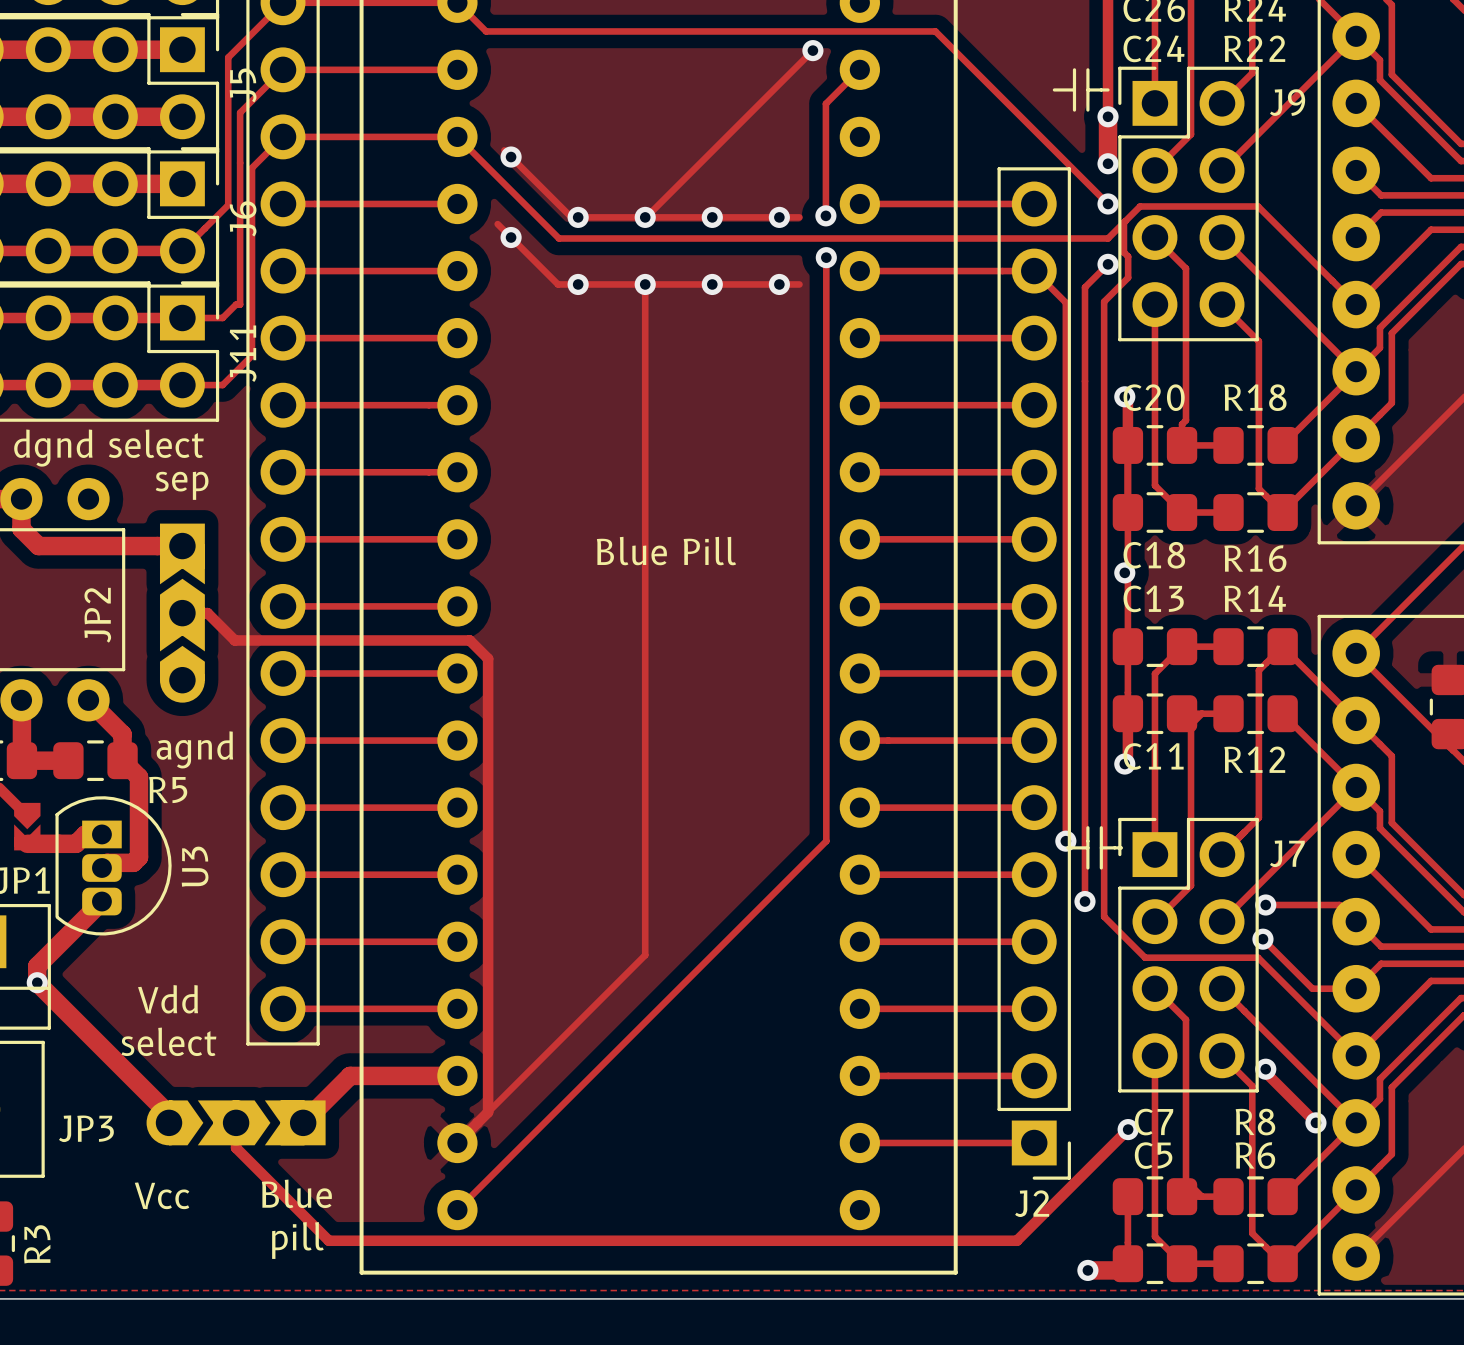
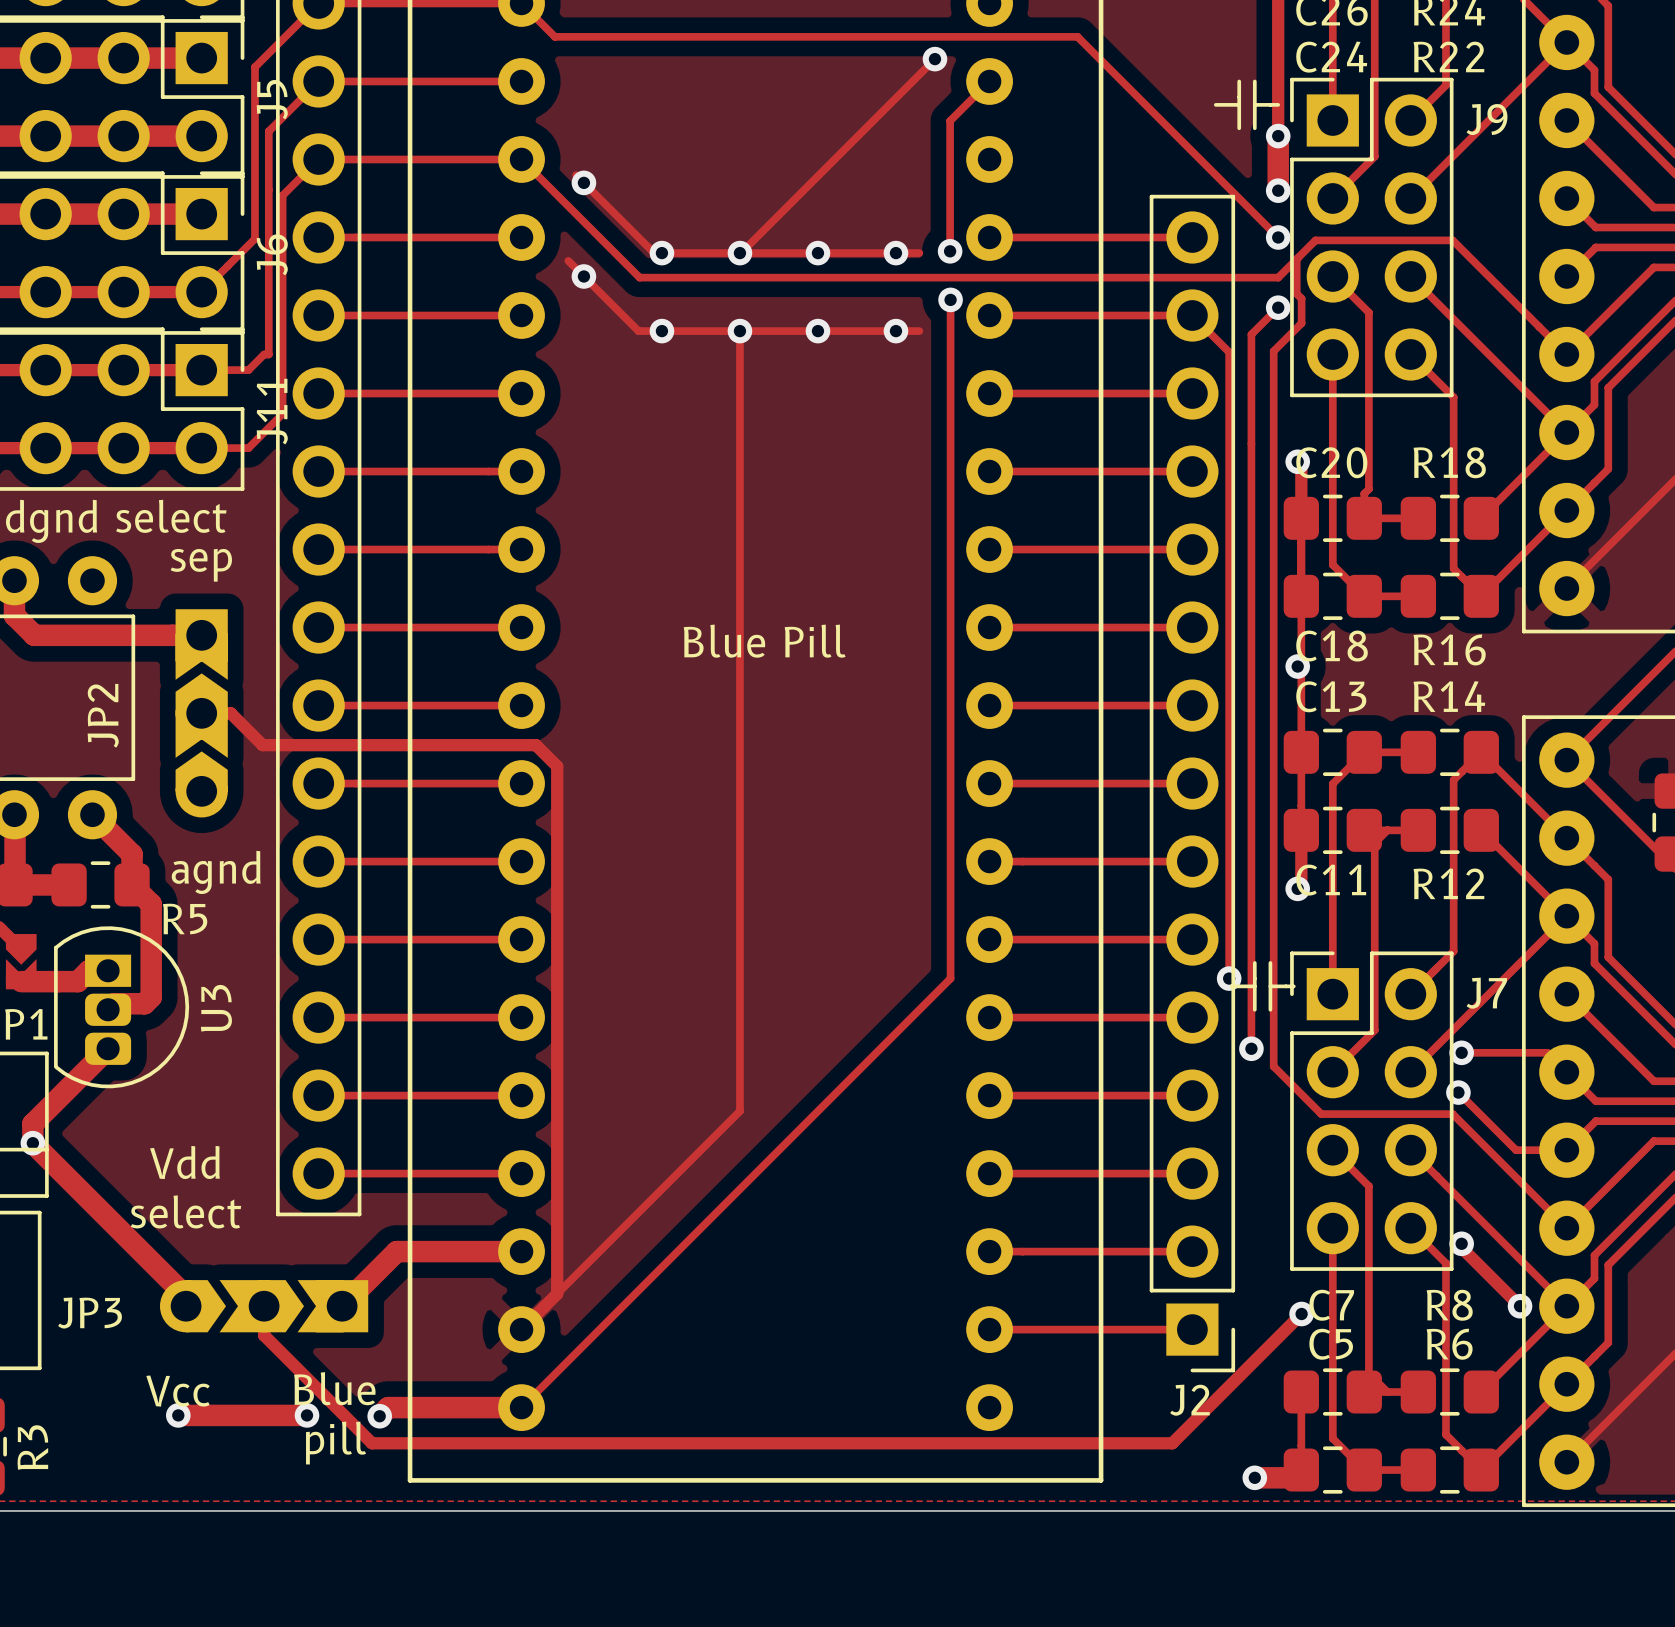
track: none -> (521, 1407) (388, 1407) (379, 1416)
track: none -> (178, 1415) (307, 1415)
via: none -> (178, 1415)
via: none -> (307, 1415)
via: none -> (379, 1416)

